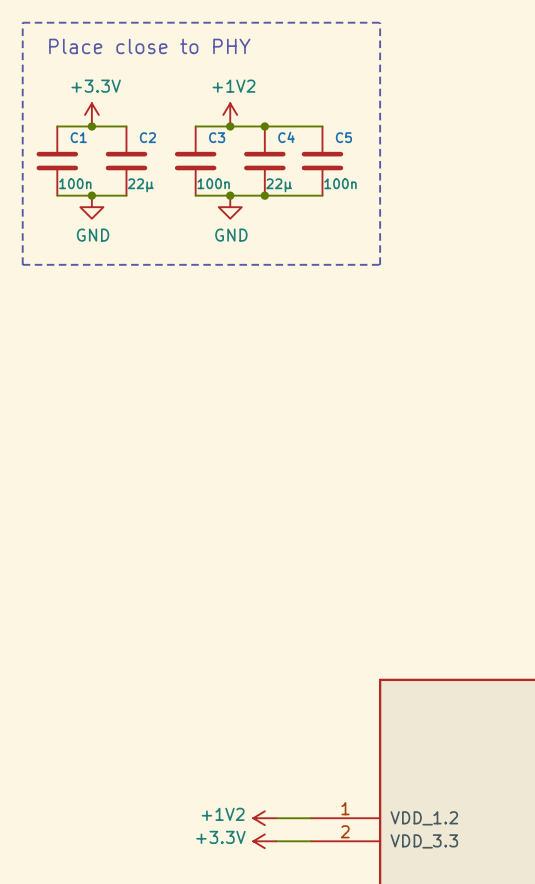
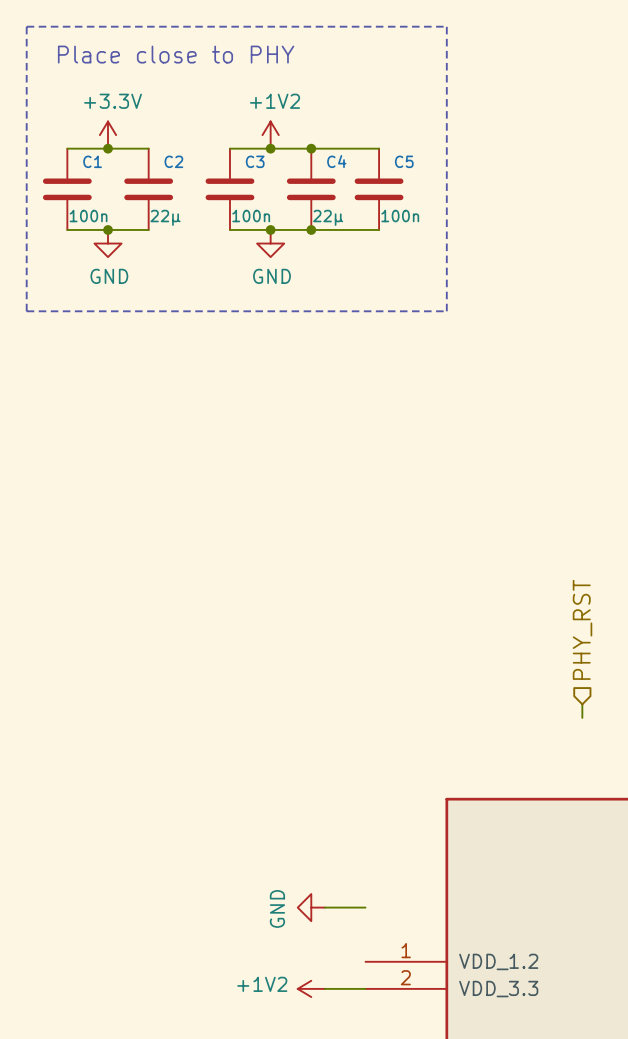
hierarchical label: none -> PHY_RST (582, 629)
wire: none -> (582, 704) (582, 717)
power symbol: none -> GND (311, 907)
power symbol: +1V2 (264, 818) -> none
wire: (276, 818) (310, 818) -> (324, 907) (365, 907)
power symbol: +3.3V (264, 841) -> +1V2 (311, 988)

